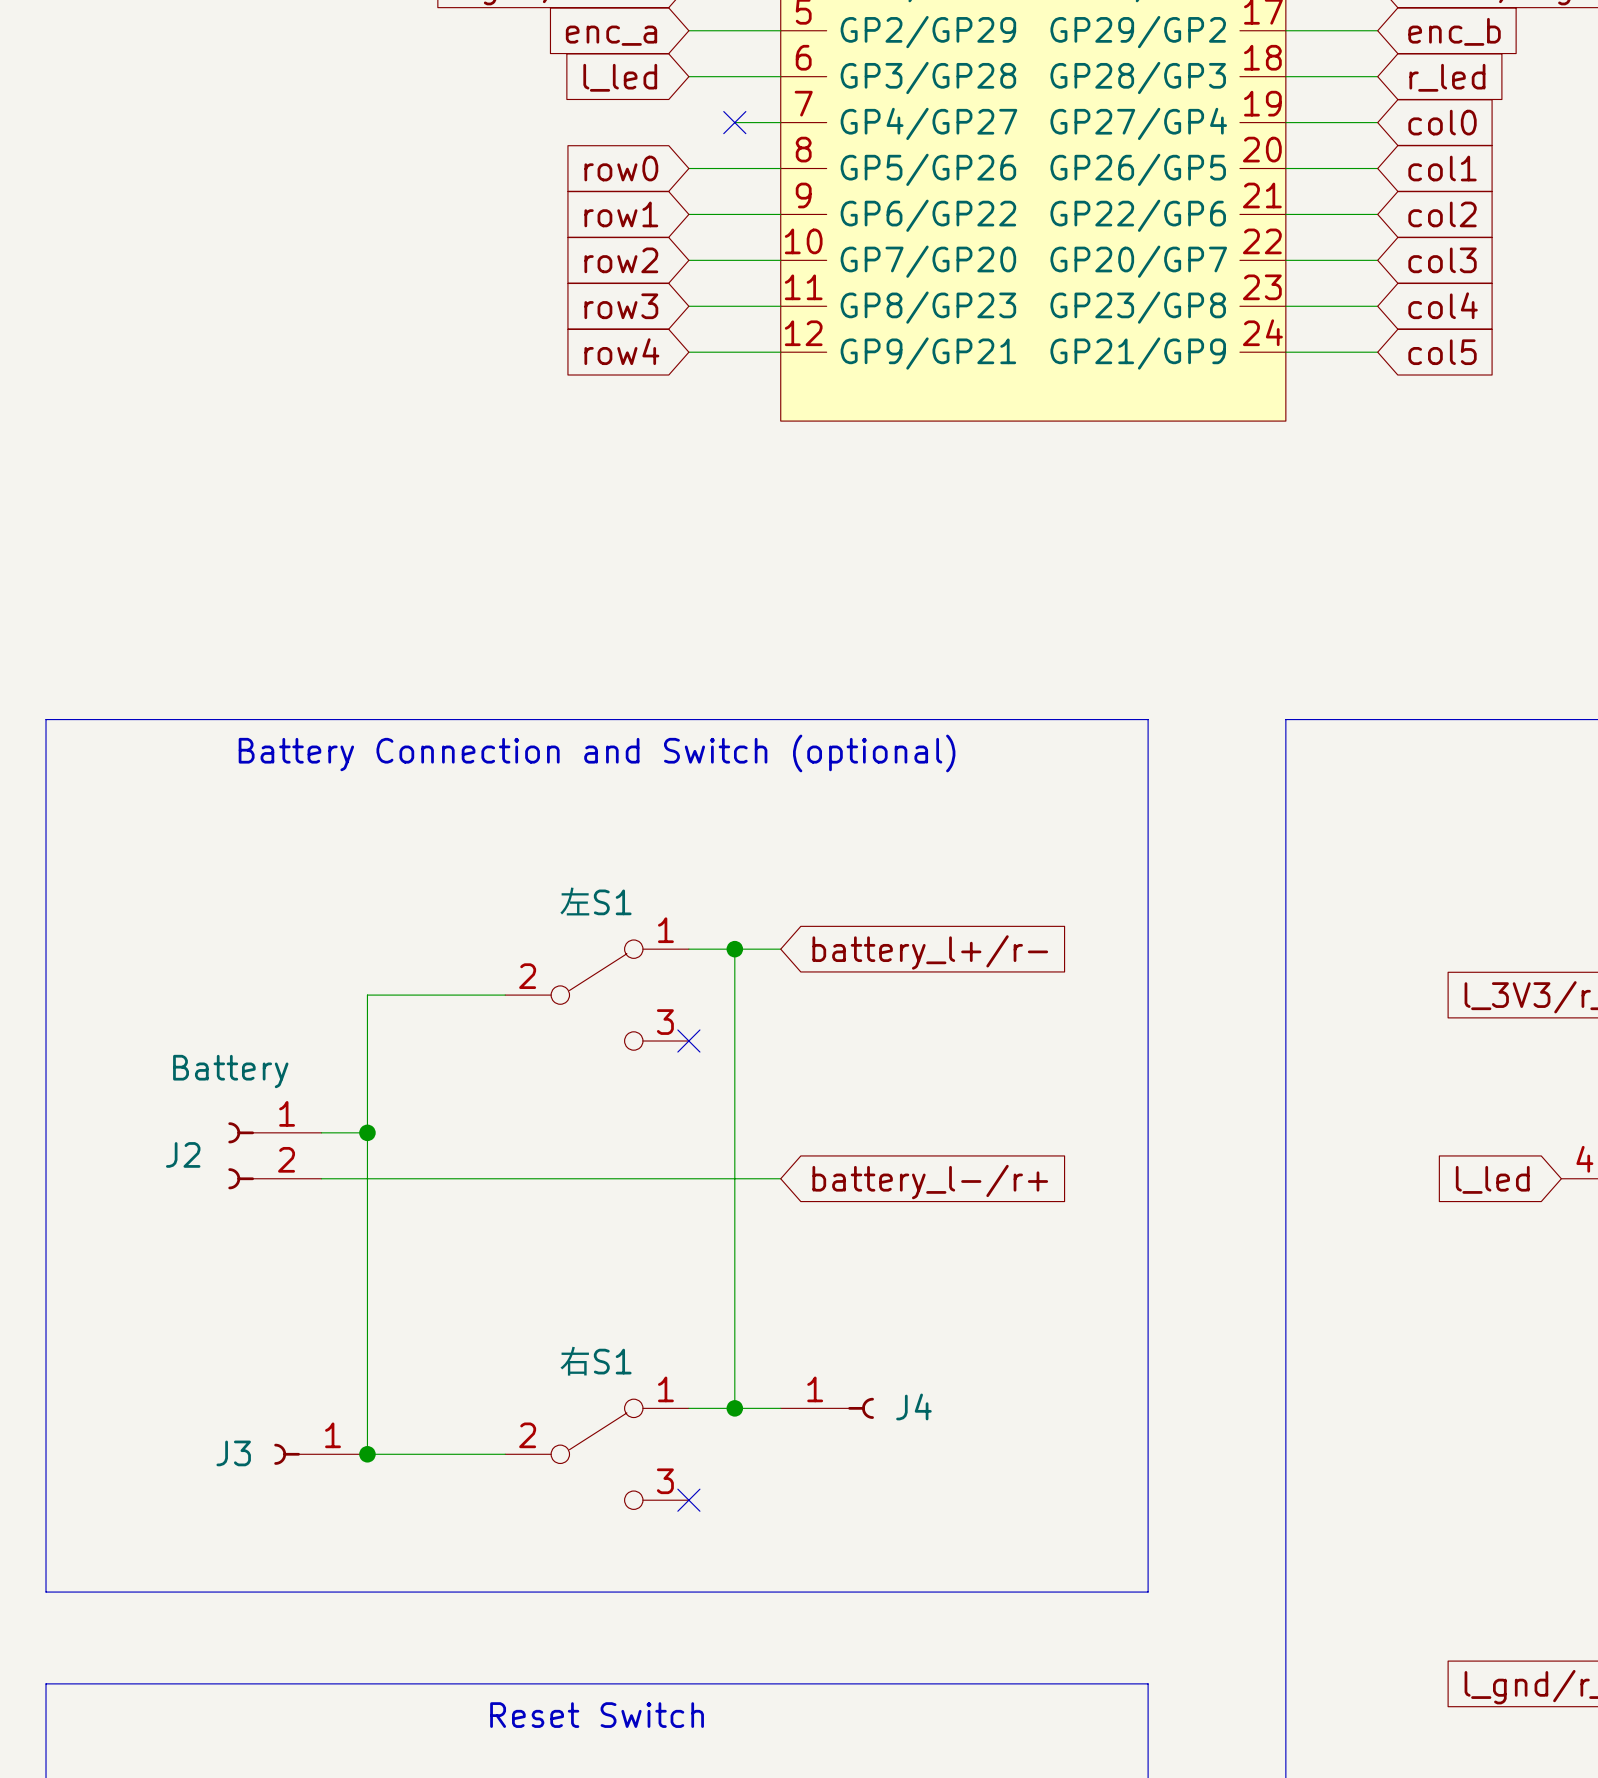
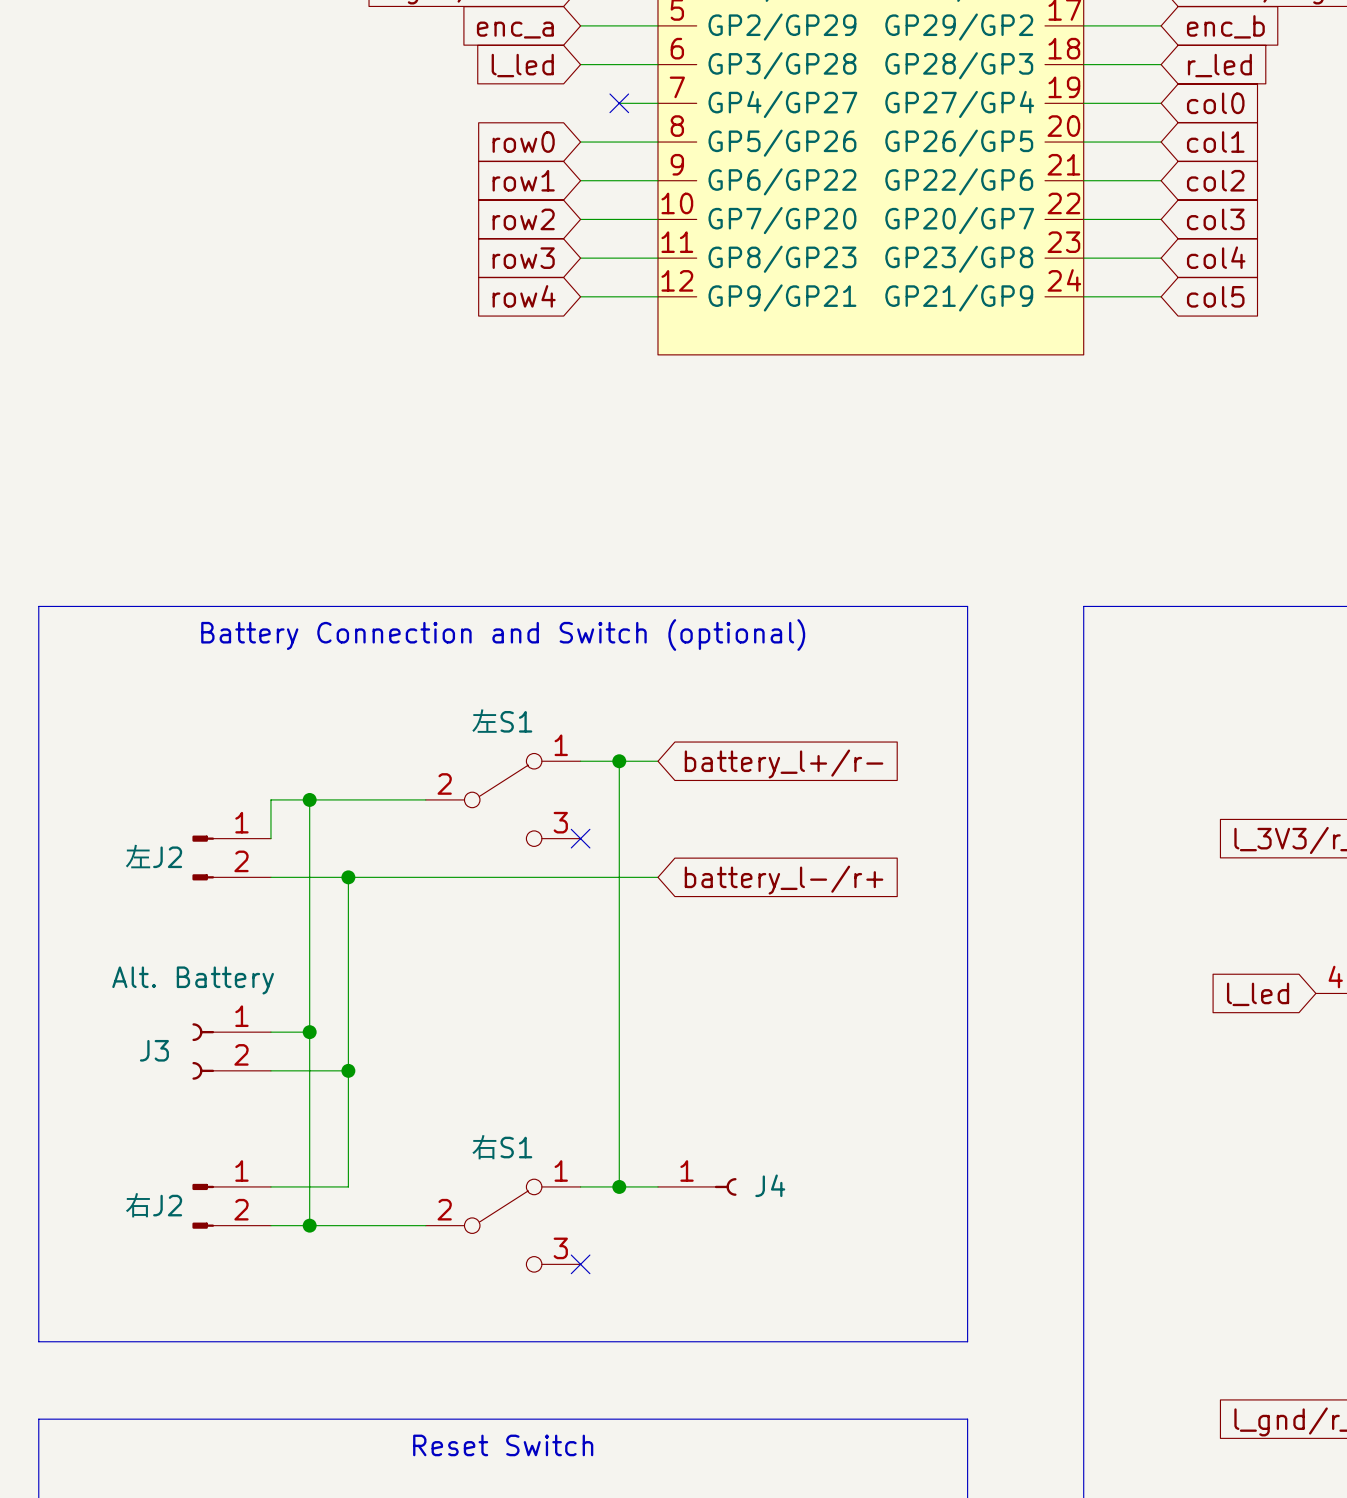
wire: none -> (619, 761) (619, 799)
junction: none -> (309, 799)
wire: none -> (425, 799) (270, 799) (270, 838)
wire: (688, 949) (780, 949) -> (580, 761) (657, 761)
junction position: (734, 949) -> (619, 761)
global label position: battery_l+/r- (930, 952) -> battery_l+/r- (784, 764)
wire: (367, 995) (505, 995) -> (309, 838) (309, 799)
左S1 position: (597, 995) -> (503, 799)
左J2: none -> (231, 857)
wire: none -> (348, 877) (348, 1186) (270, 1186)
junction: none -> (348, 877)
no-connect mark position: (688, 1041) -> (580, 838)
wire: (321, 1132) (367, 1132) -> (270, 1032) (309, 1032)
junction: (367, 1132) -> none
J2: Battery (274, 1155) -> none
J3 value: none -> Alt. Battery (193, 980)
wire: (321, 1178) (780, 1178) -> (270, 877) (657, 877)
global label position: battery_l-/r+ (930, 1182) -> battery_l-/r+ (784, 880)
junction: none -> (309, 1032)
wire: none -> (270, 1070) (348, 1070)
junction: none -> (348, 1070)
右J2: none -> (231, 1206)
J3 symbol: [274, 1443, 368, 1465] -> [192, 1023, 271, 1080]

